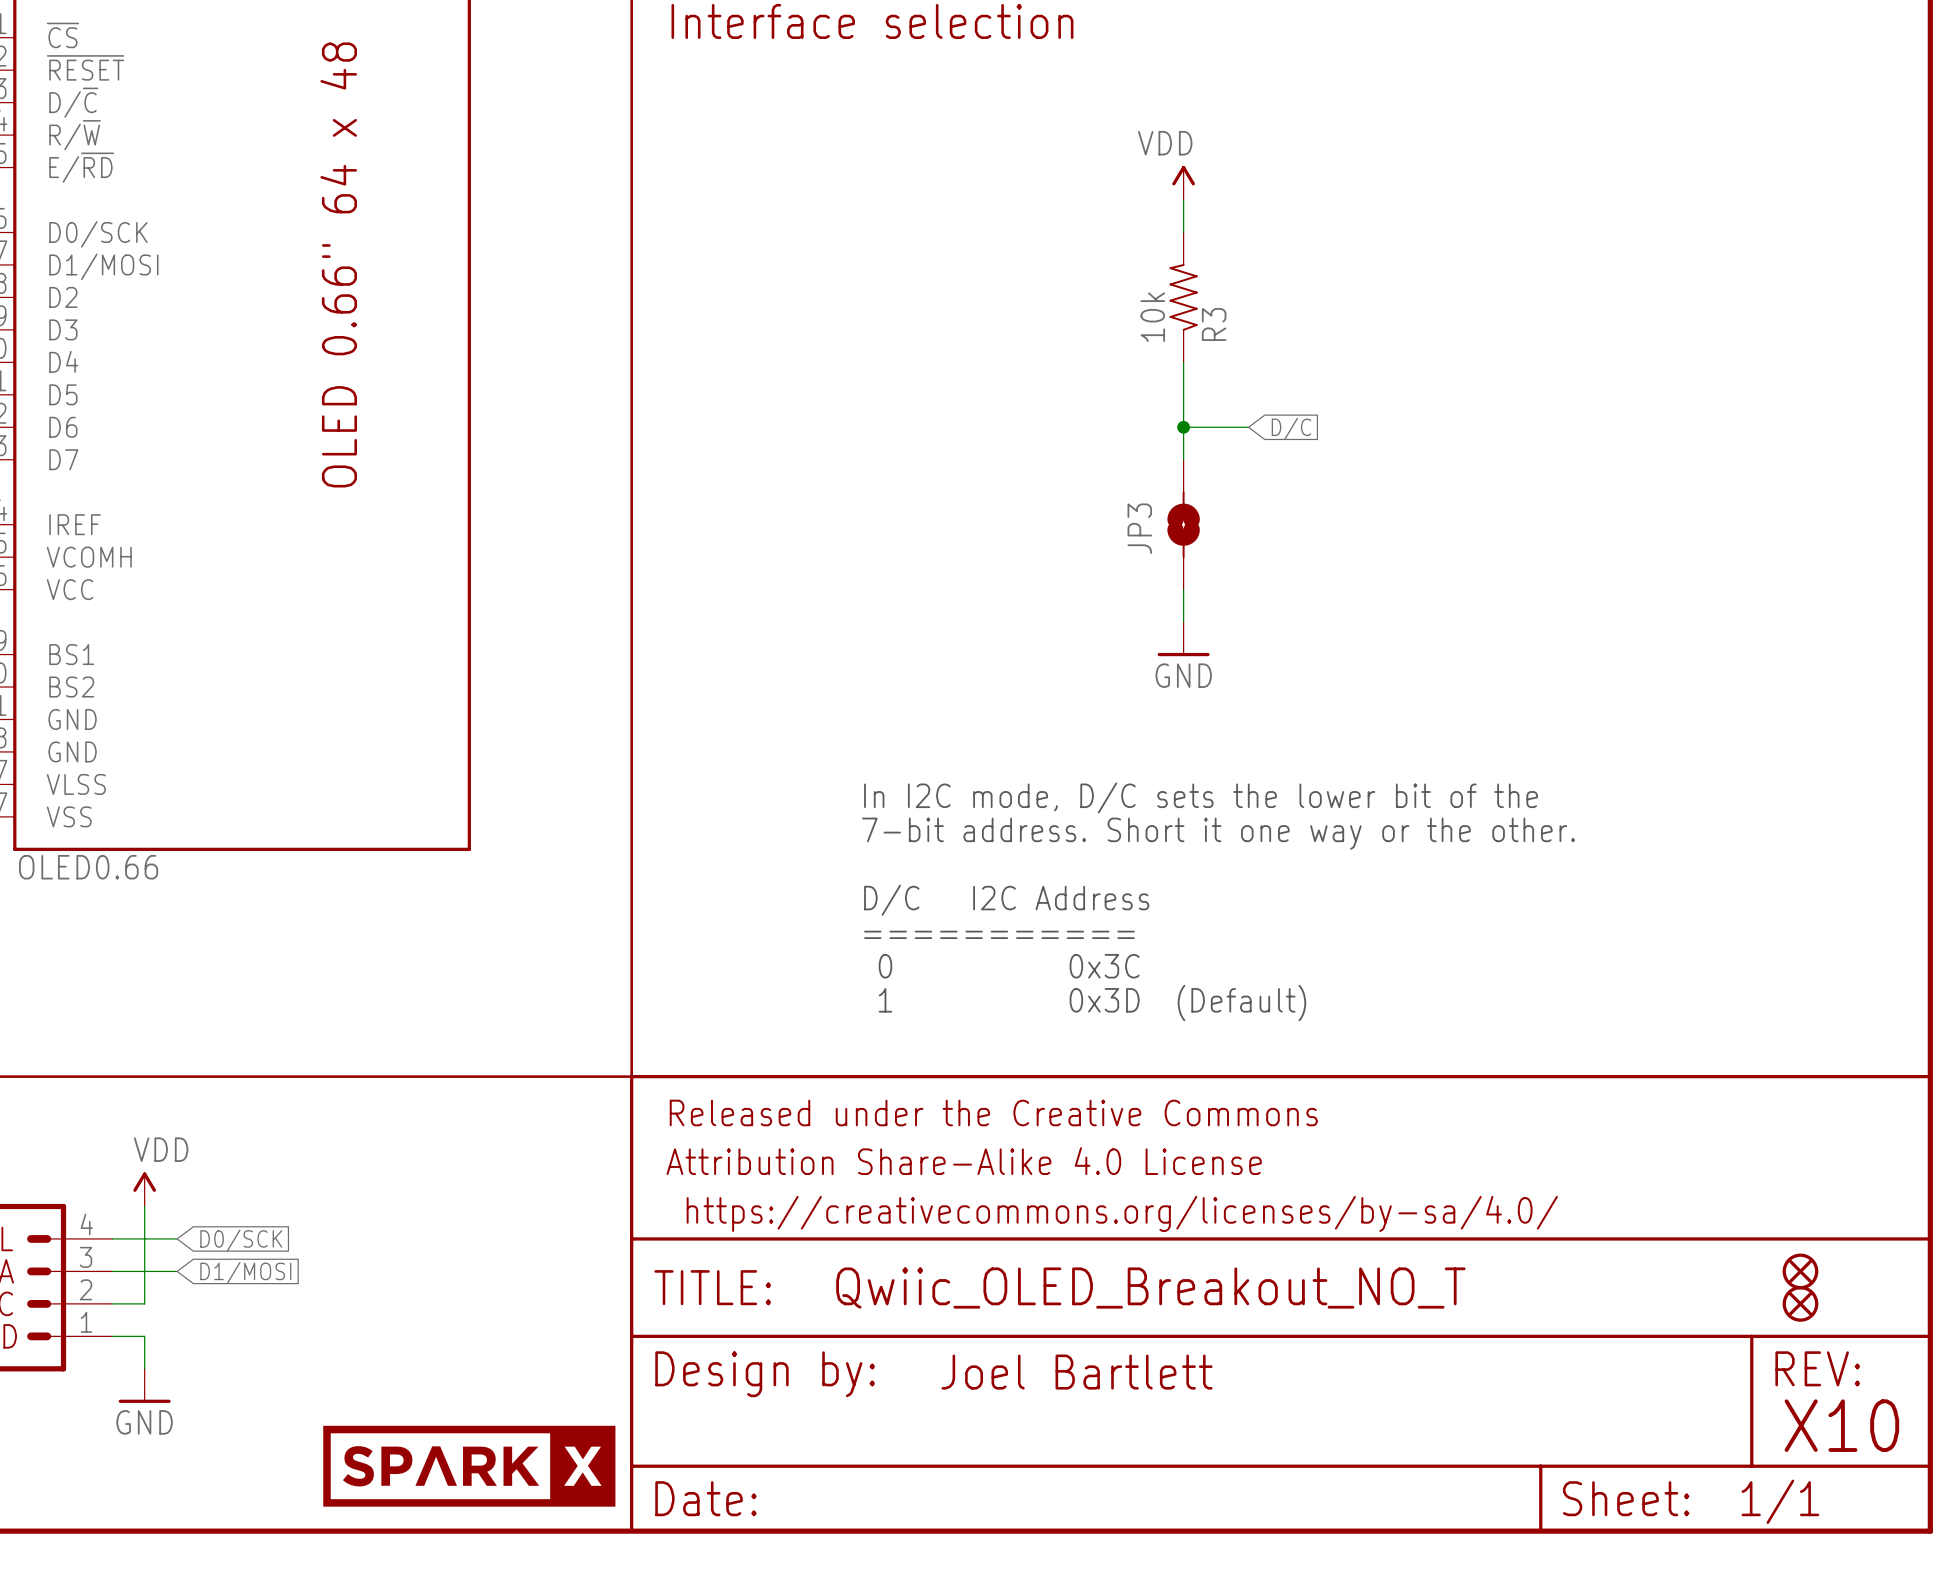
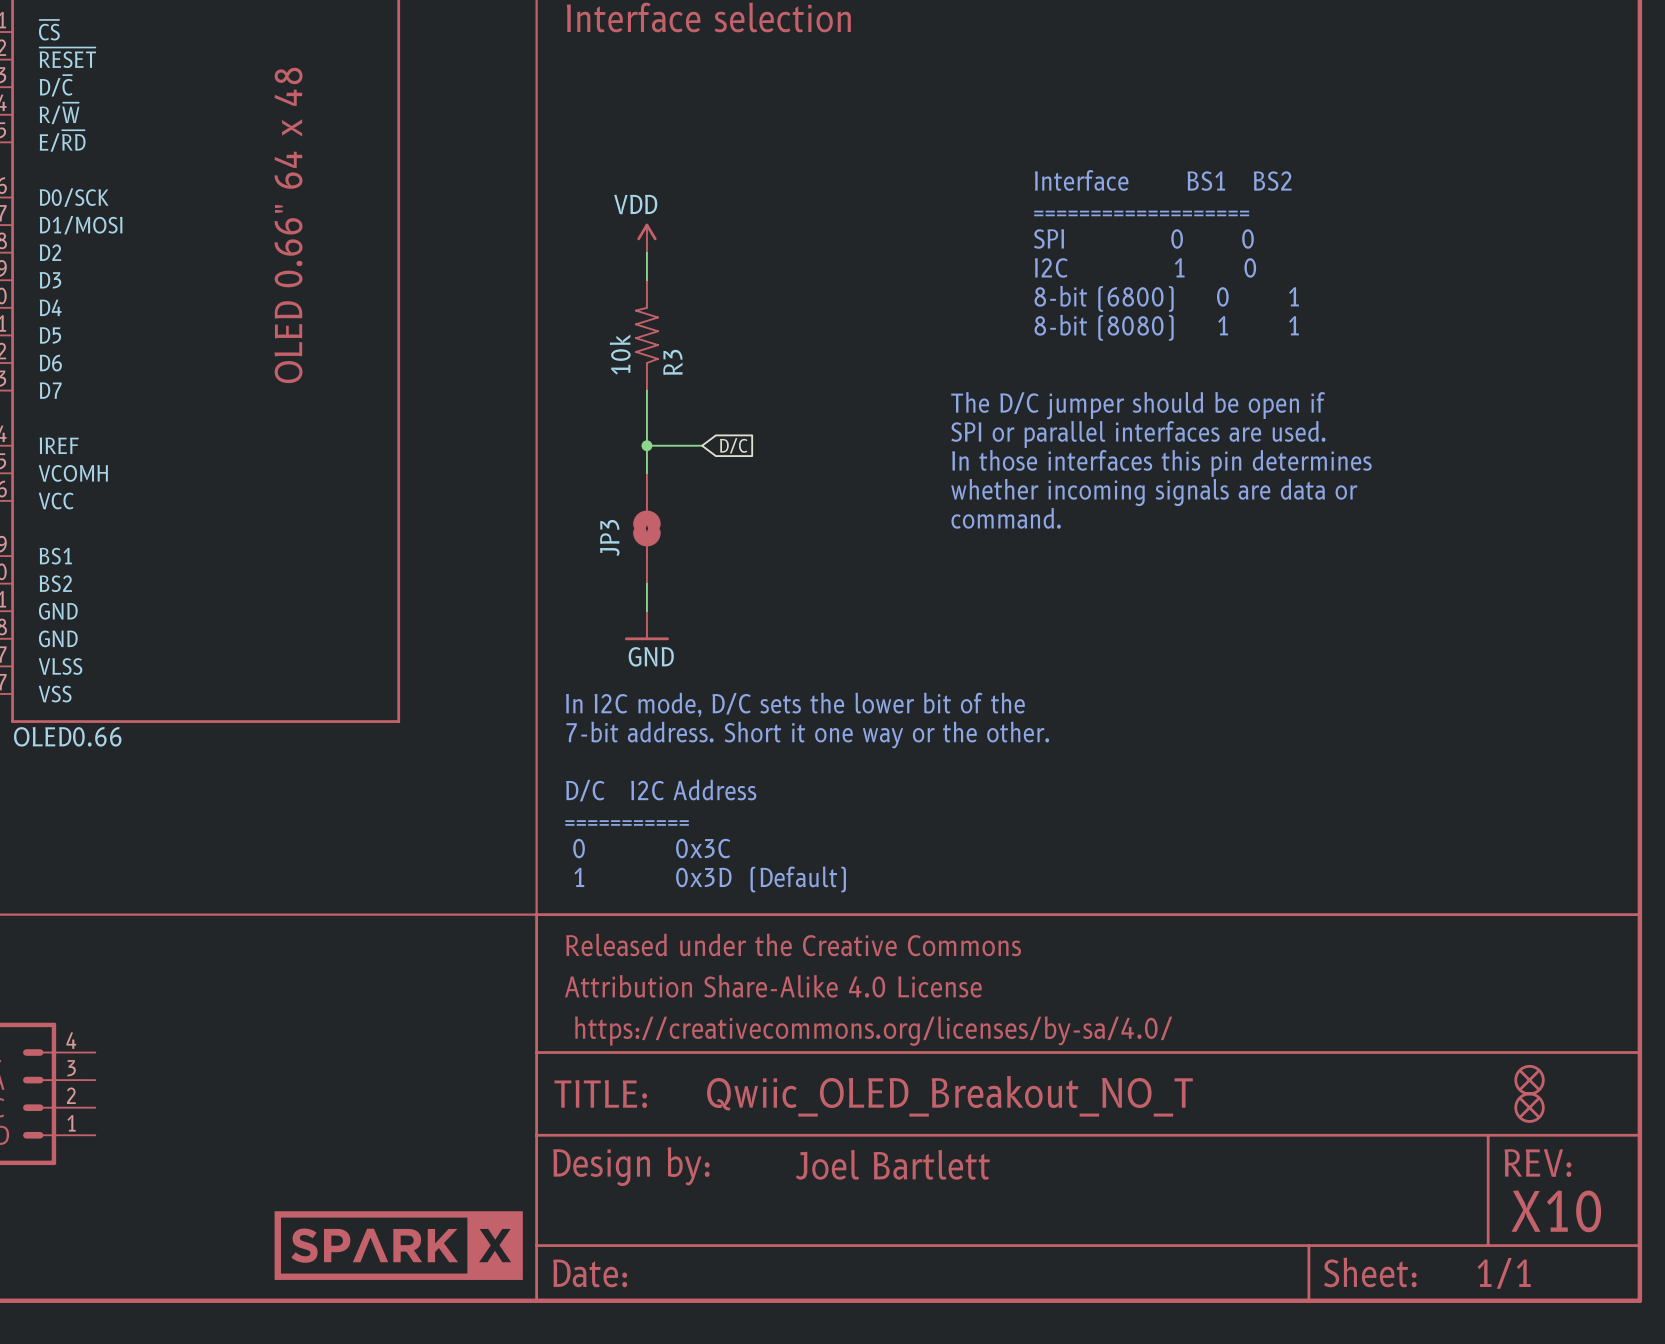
power symbol: VDD (1183, 182) -> none
wire: (1183, 200) (1183, 232) -> none
text: none -> Interface BS1 BS2 (1163, 180)
text: none -> =================== (1141, 213)
power symbol: none -> VDD (646, 238)
text: none -> SPI 0 0 (1143, 238)
wire: none -> (646, 252) (646, 280)
R3 position: (1183, 297) -> (646, 335)
text: none -> I2C 1 0 (1145, 267)
text: none -> 8-bit (6800) 0 1 (1166, 298)
wire: (1183, 362) (1183, 459) -> none
text: none -> 8-bit (8080) 1 1 (1166, 327)
wire: (1183, 427) (1248, 427) -> none
junction: (1183, 427) -> none
global label: D/C (1291, 428) -> none
wire: none -> (646, 390) (646, 473)
text: none -> The D/C jumper should be open if (1138, 405)
text: none -> SPI or parallel interfaces are used. (1138, 434)
wire: none -> (646, 445) (702, 445)
junction: none -> (646, 445)
JP3 position: (1183, 524) -> (646, 528)
global label: none -> D/C (733, 445)
text: none -> In those interfaces this pin determines (1161, 463)
text: none -> whether incoming signals are data or (1154, 492)
wire: (1183, 589) (1183, 622) -> none
text: none -> command. (1006, 518)
power symbol: GND (1183, 639) -> none
wire: none -> (646, 583) (646, 611)
power symbol: none -> GND (646, 625)
text position: In I2C mode, D/C sets the lower bit of the (1201, 797) -> In I2C mode, D/C sets the lower bit of the (795, 704)
text position: 7-bit address. Short it one way or the other. (1218, 833) -> 7-bit address. Short it one way or the other. (807, 734)
text position: D/C I2C Address (1006, 900) -> D/C I2C Address (661, 790)
text position: =========== (999, 934) -> =========== (627, 823)
text position: 0 0x3C (1009, 966) -> 0 0x3C (651, 848)
text position: 1 0x3D (Default) (1092, 1003) -> 1 0x3D (Default) (710, 879)
power symbol: VDD (144, 1189) -> none
wire: (144, 1206) (144, 1303) (112, 1303) -> none
wire: (112, 1238) (177, 1238) -> none
global label: D0/SCK (241, 1240) -> none
wire: (112, 1271) (177, 1271) -> none
global label: D1/MOSI (245, 1272) -> none
wire: (112, 1336) (144, 1336) (144, 1368) -> none
power symbol: GND (144, 1385) -> none

